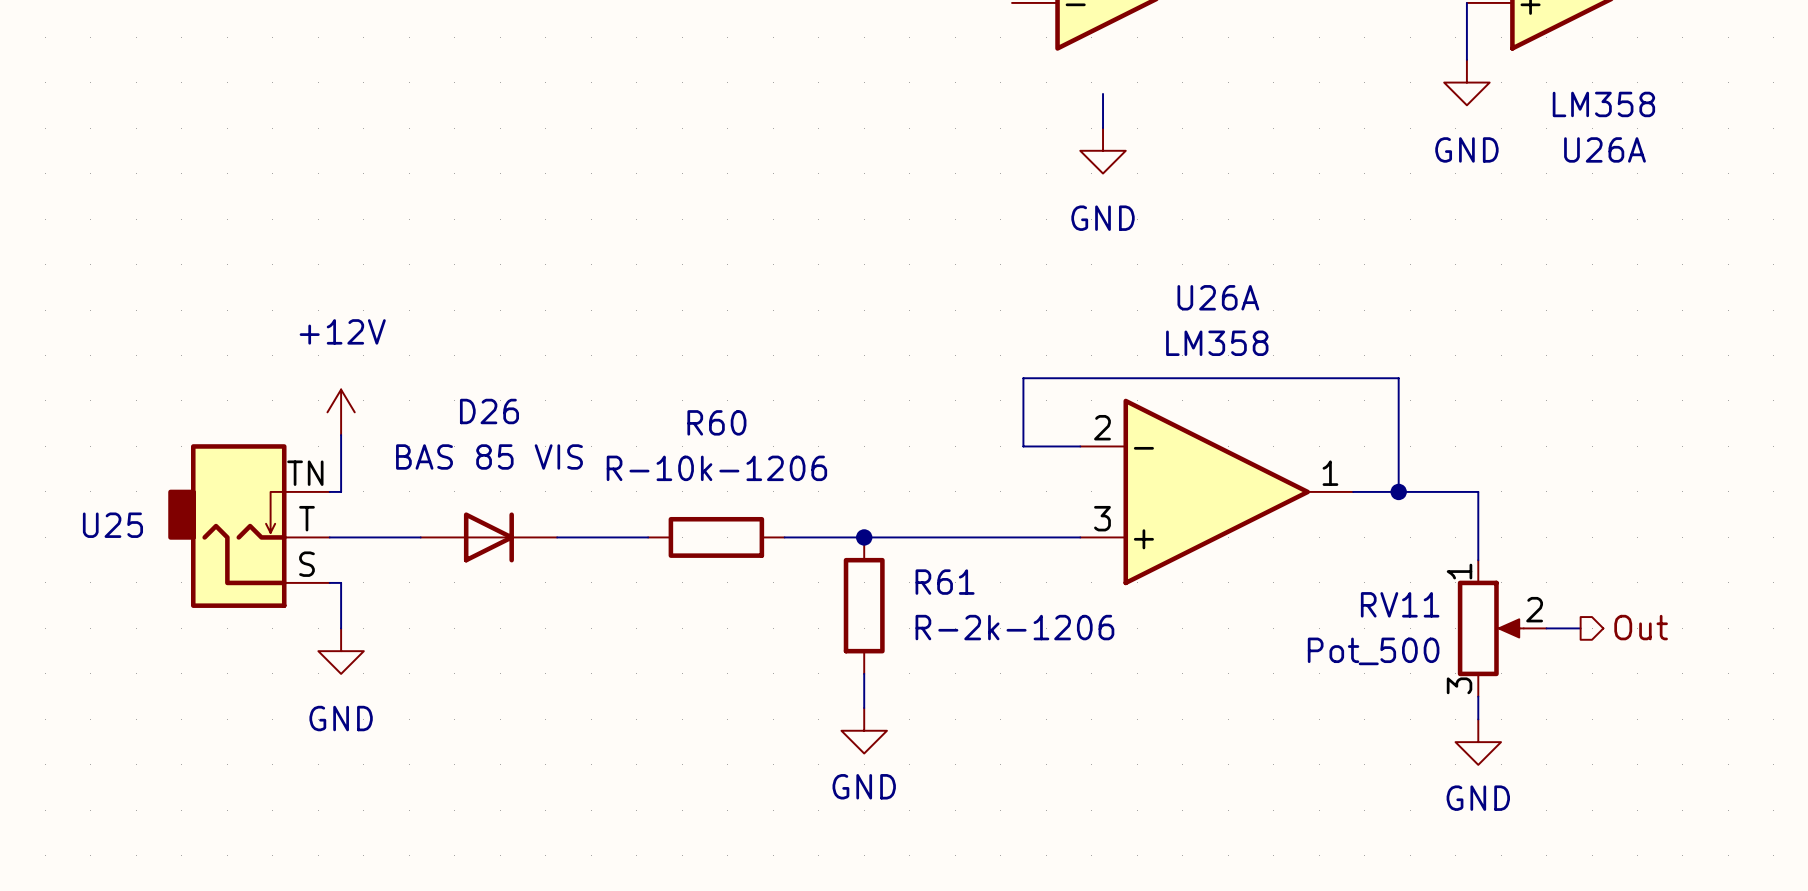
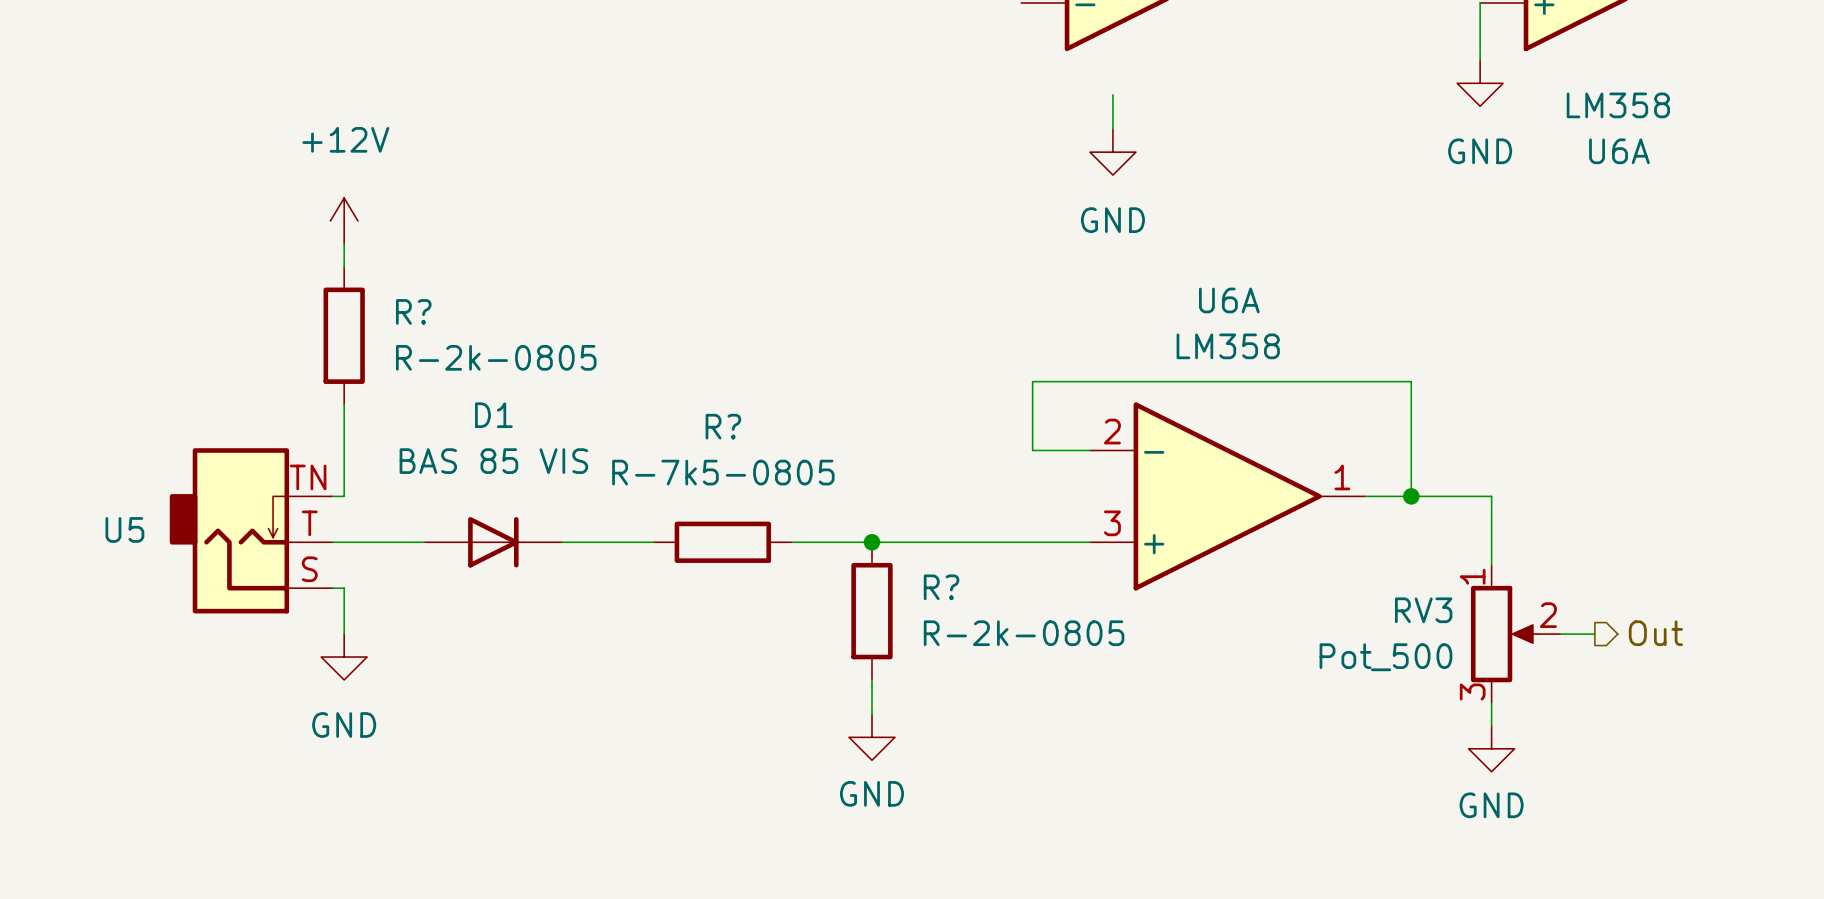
U26A name: U26A (1605, 149) -> U6A (1619, 151)
wire: none -> (344, 243) (344, 266)
U26A name: U26A (1218, 297) -> U6A (1229, 300)
R?: none -> R-2k-0805 (344, 335)
D26 name: D26 (489, 411) -> D1 (493, 415)
power symbol position: +12V (341, 412) -> +12V (344, 221)
R60 name: R60 (716, 422) -> R? (723, 426)
R60 value: R-10k-1206 (716, 468) -> R-7k5-0805 (723, 472)
U25 name: U25 (112, 525) -> U5 (124, 529)
R61 name: R61 (945, 582) -> R? (941, 587)
RV11 name: RV11 (1400, 604) -> RV3 (1423, 610)
R61 value: R-2k-1206 (1014, 627) -> R-2k-0805 (1024, 633)

